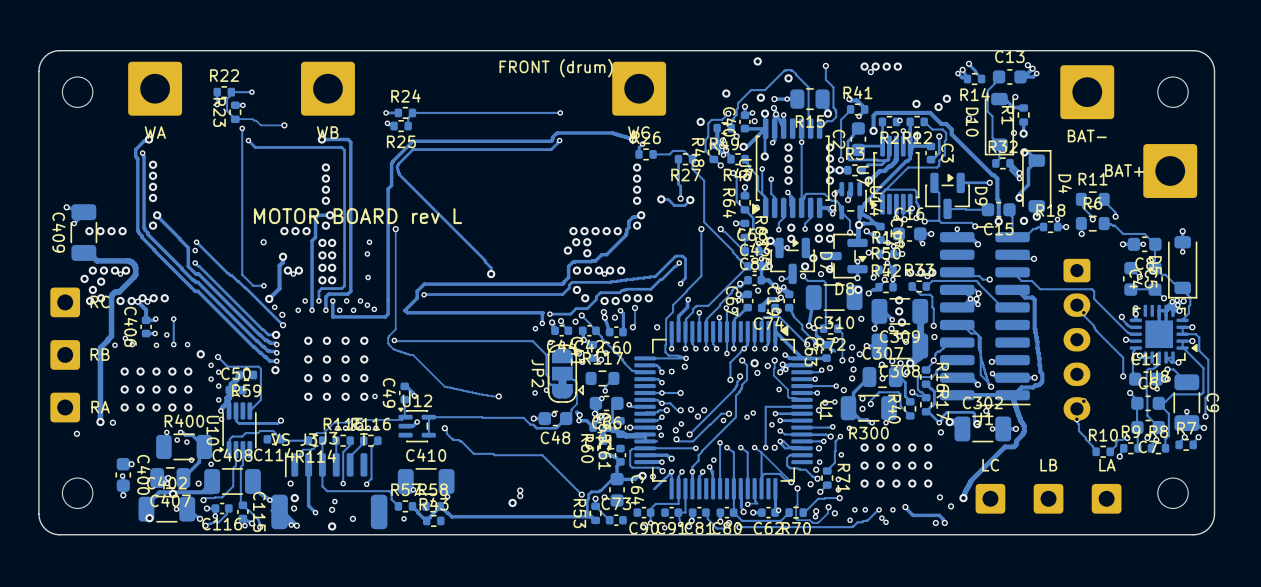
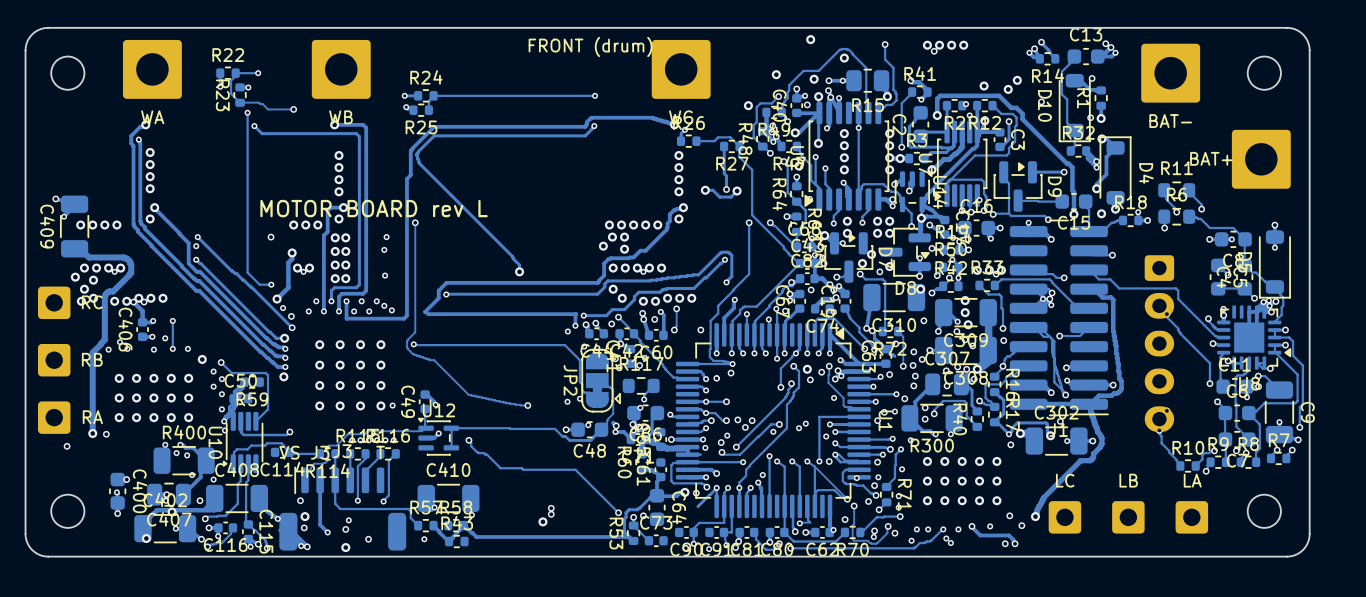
track: none -> (1089, 327) (1080, 336) (1059, 336)
via: none -> (1059, 336)
via: none -> (856, 478)
via: none -> (845, 519)
via: none -> (990, 526)

